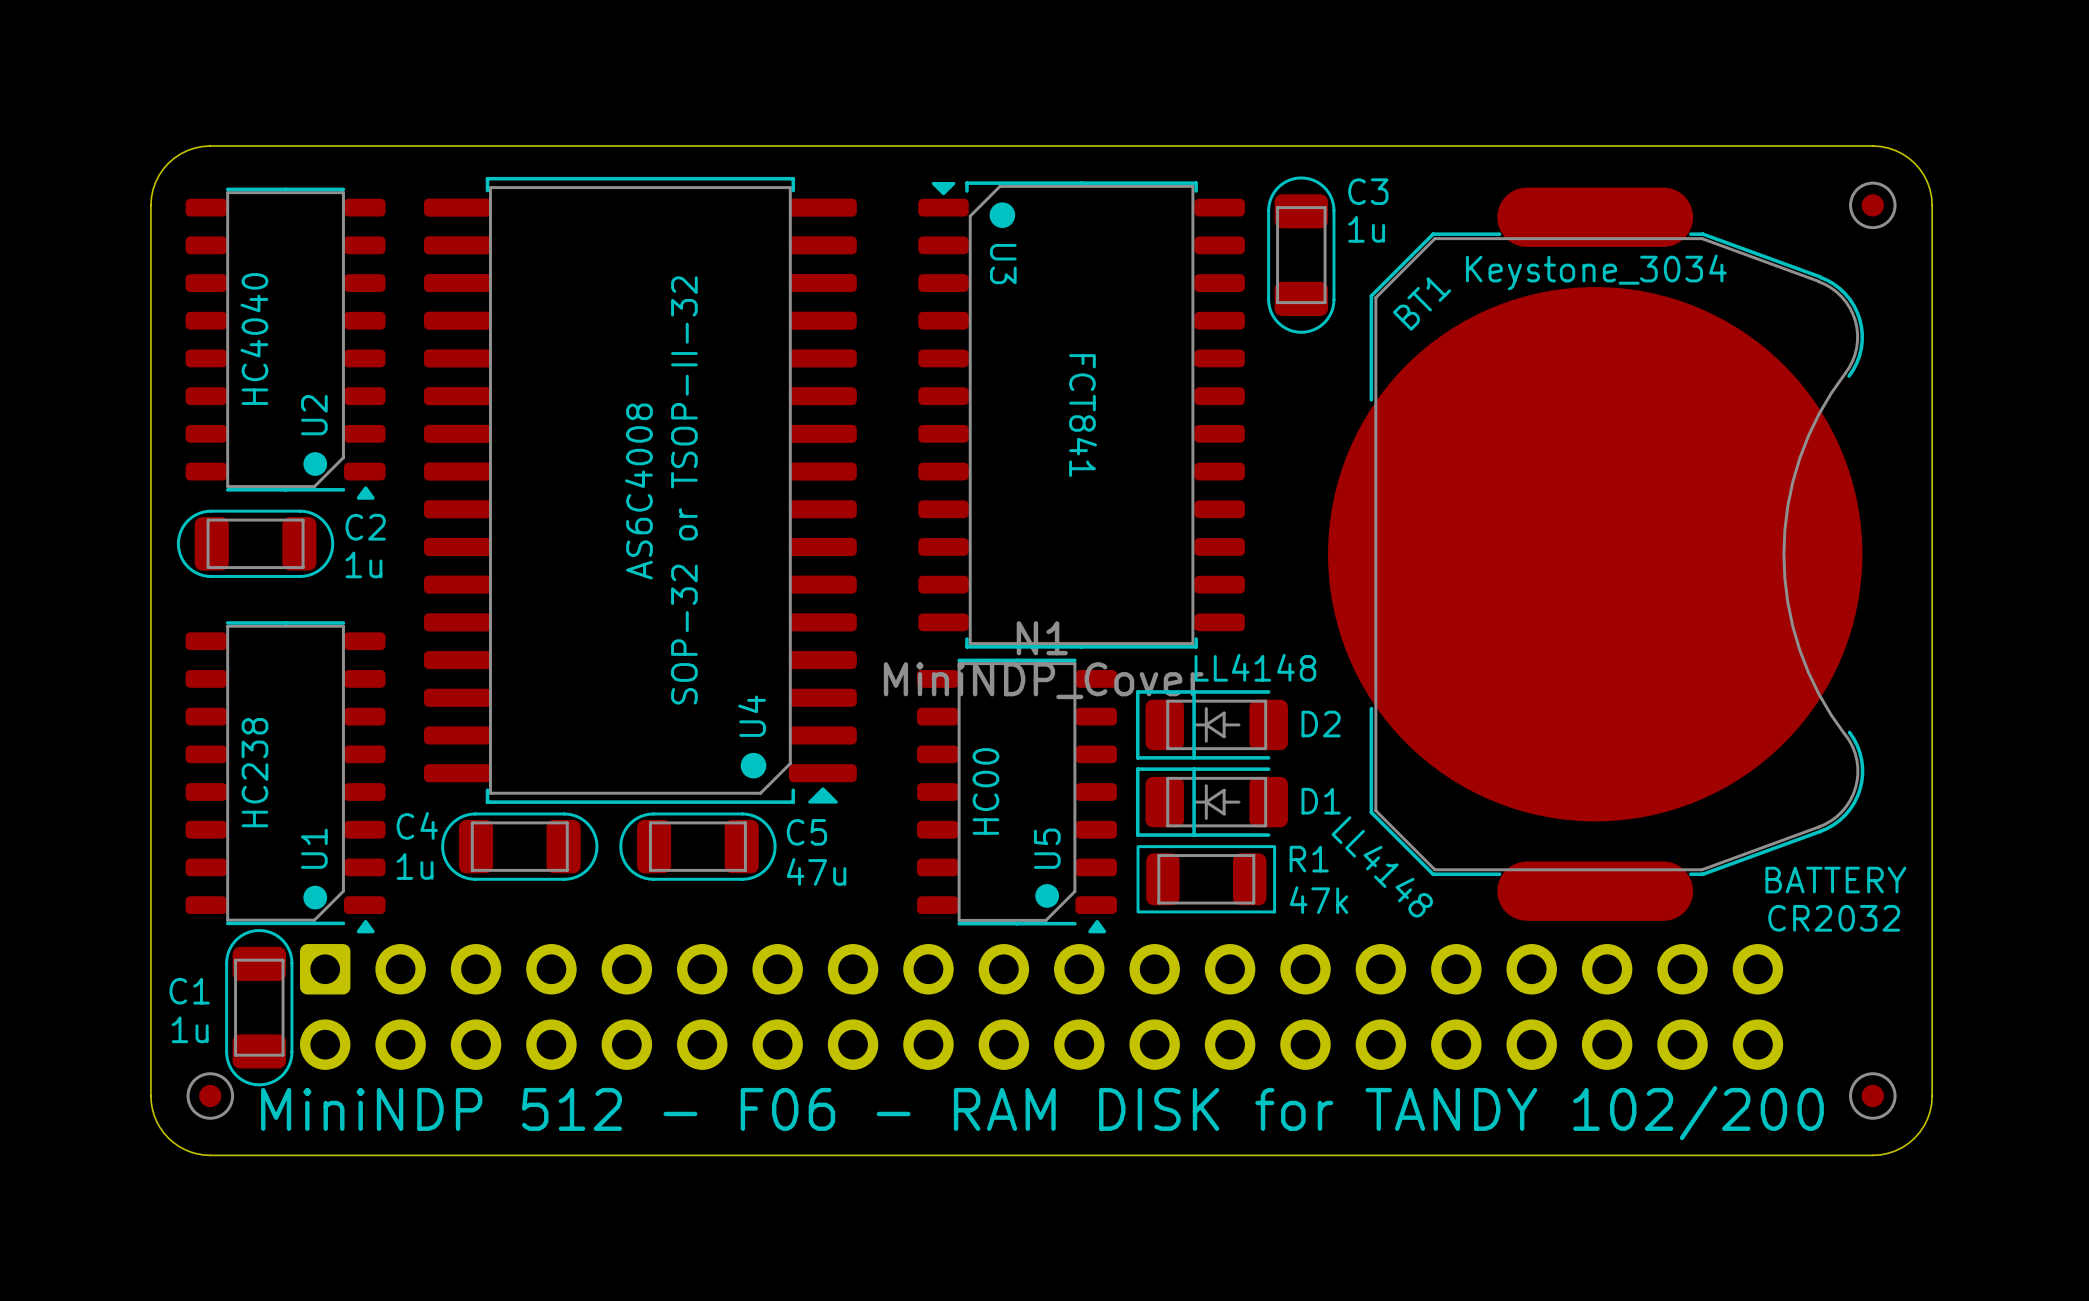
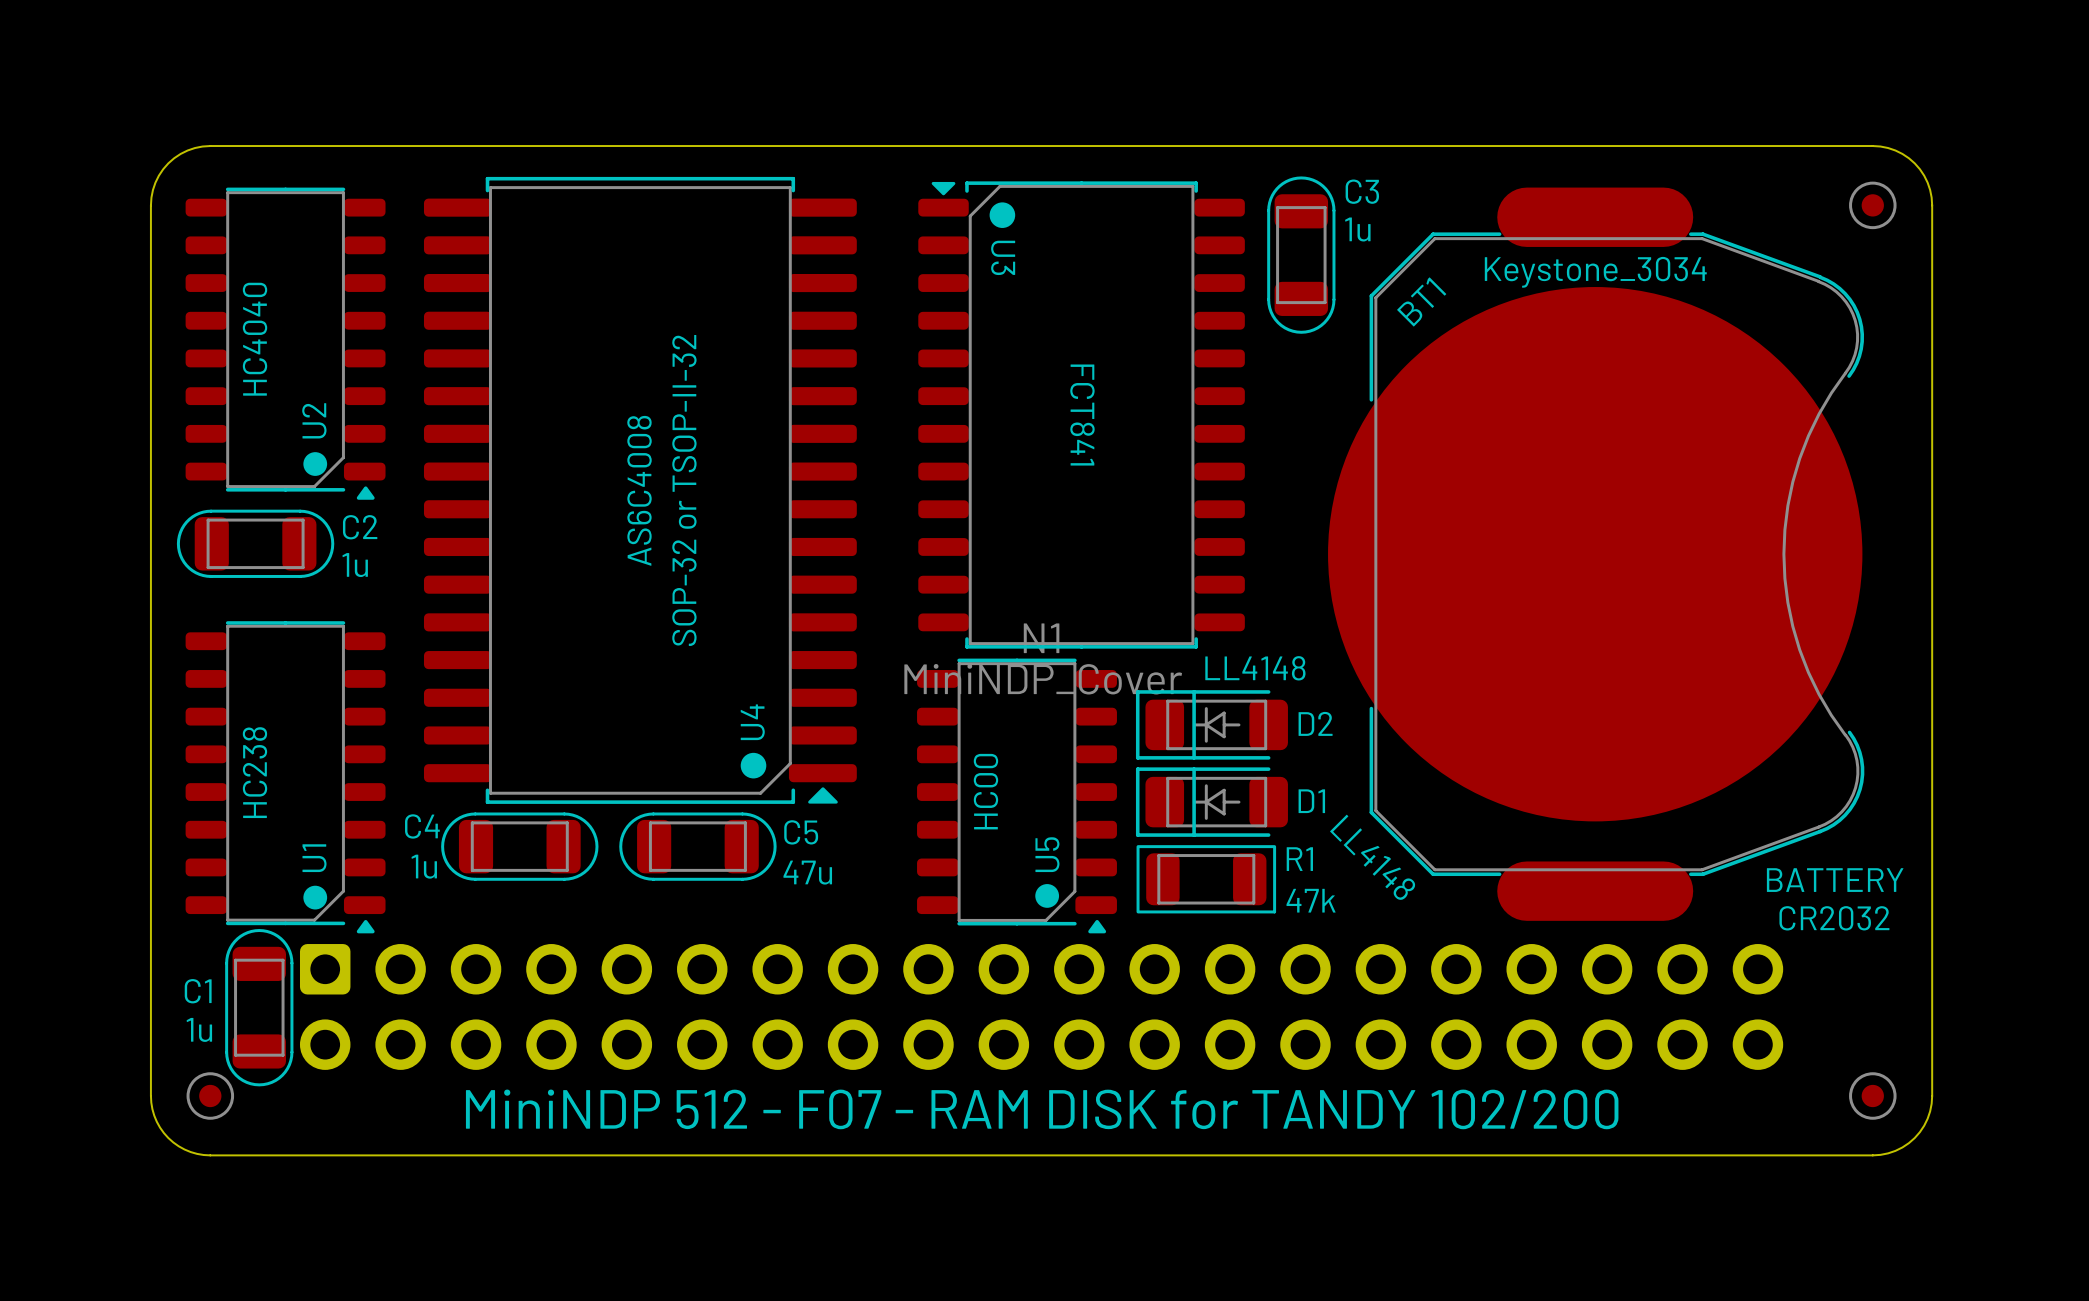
text: MiniNDP 512 - F06 - RAM DISK for TANDY 102/200 (1042, 1113) -> MiniNDP 512 - F07 - RAM DISK for TANDY 102/200 (1042, 1109)

